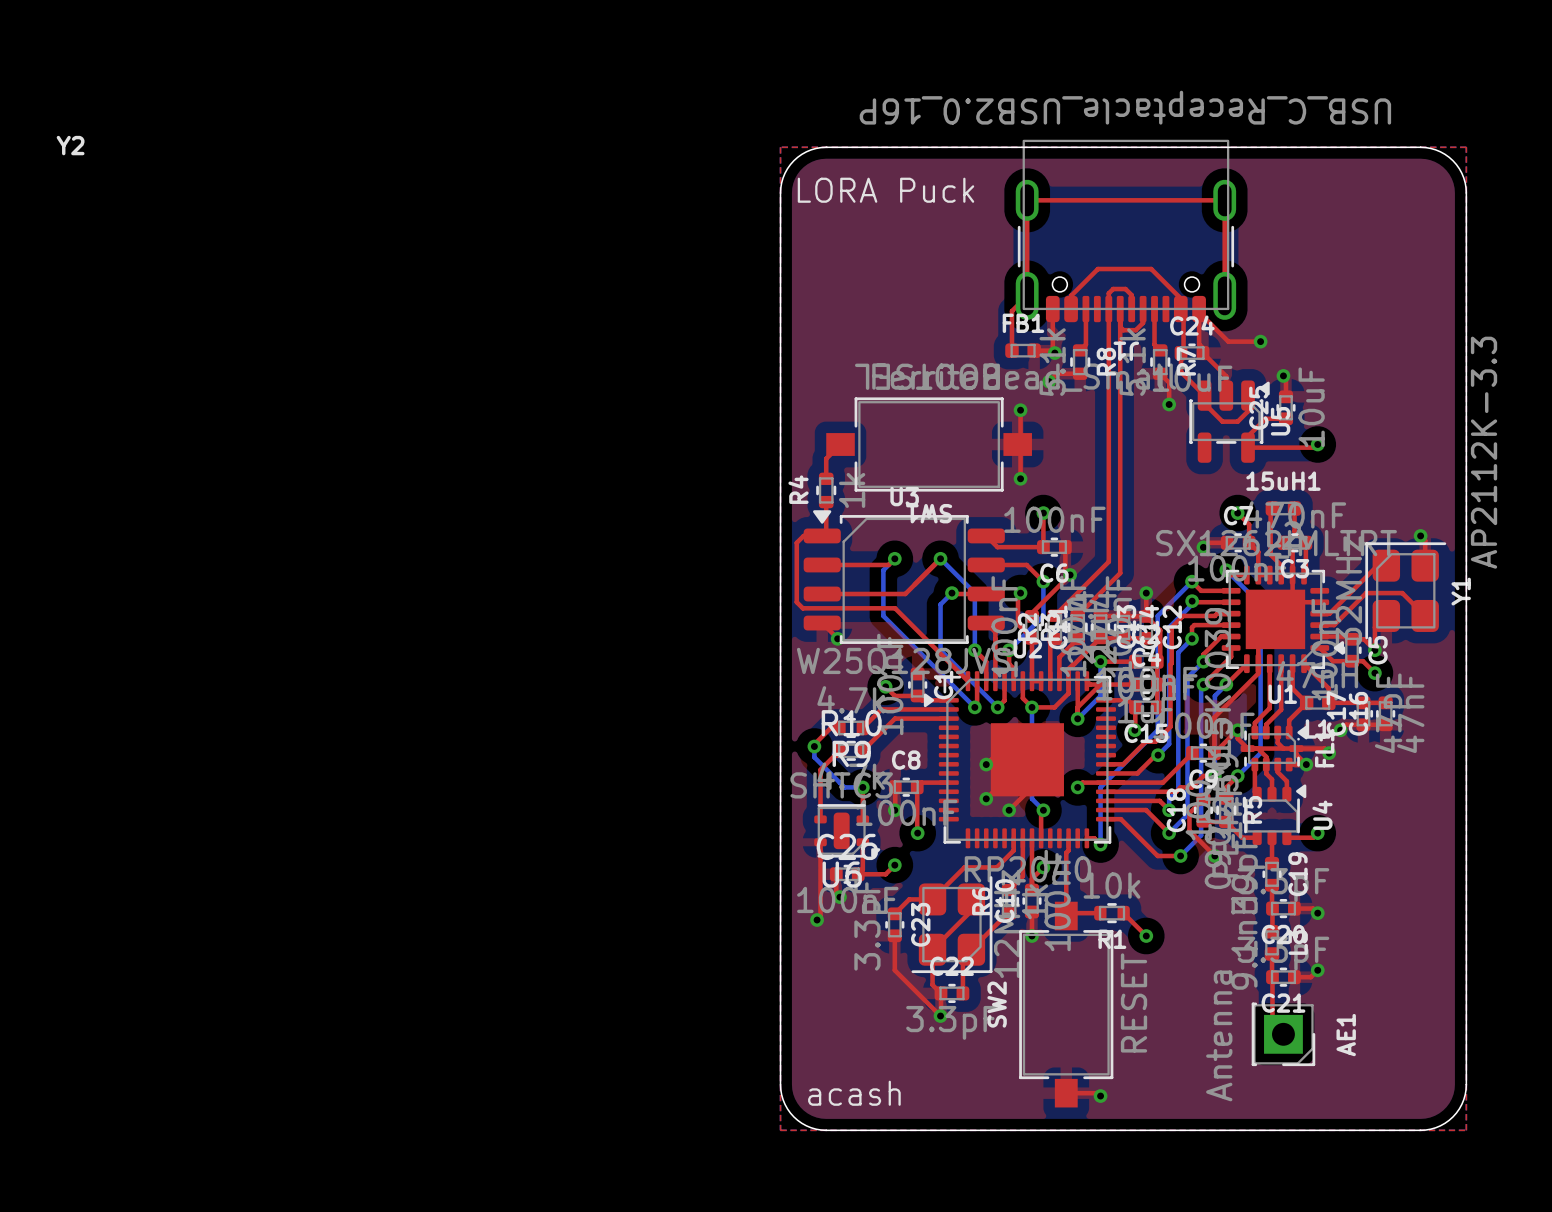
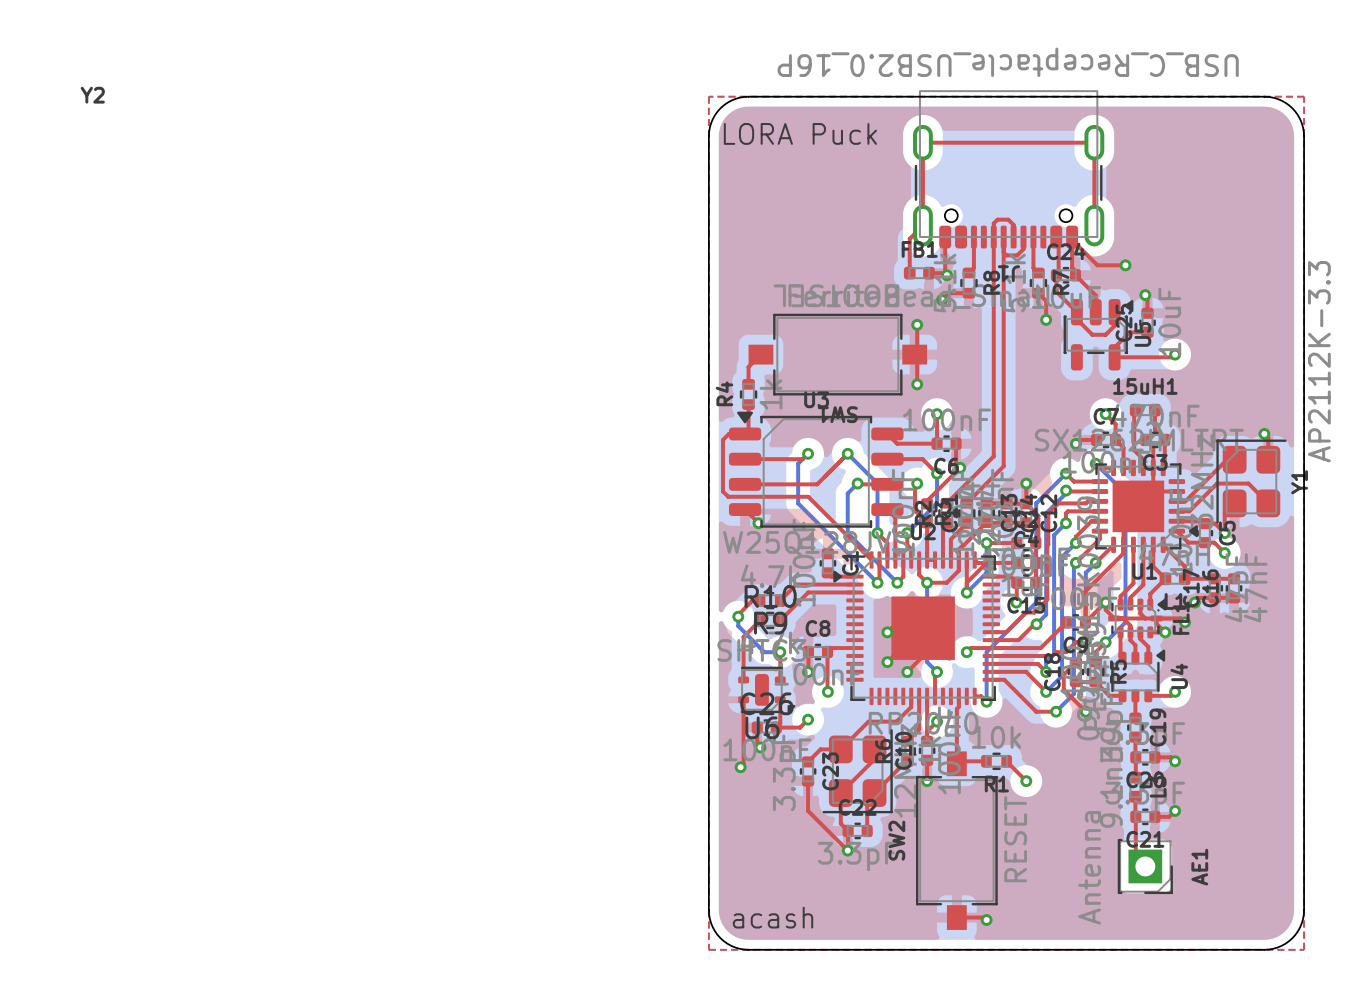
top track: (1071, 309) (1071, 295) (1097, 269) (1151, 269) (1180, 298) (1180, 309) -> none
top track: (885, 686) (894, 695) (917, 695) -> none
via: (885, 686) -> none

